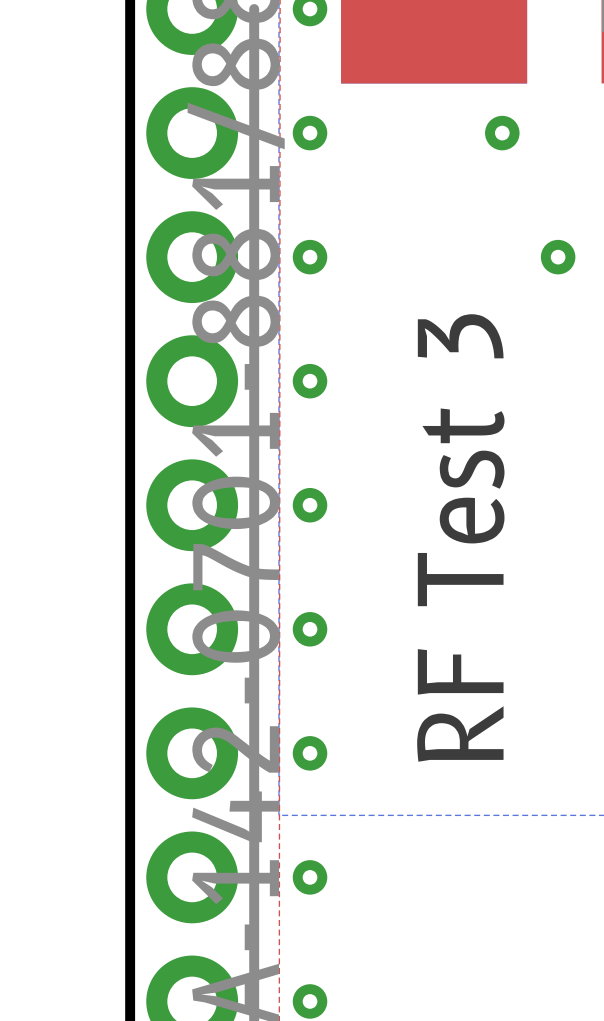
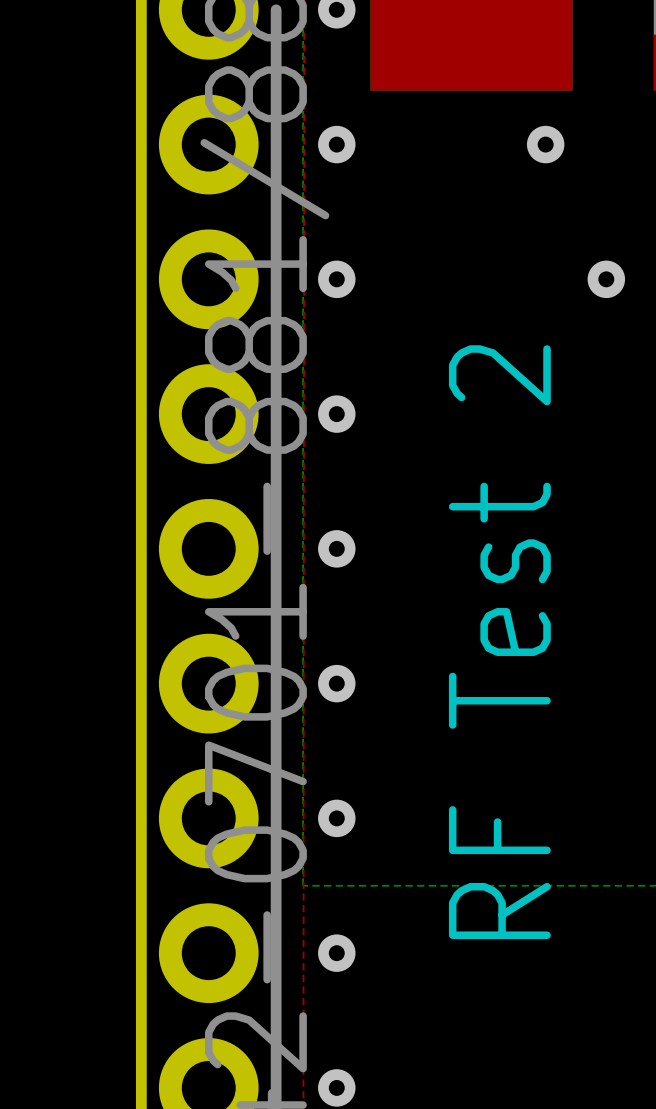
text: RF Test 3 (460, 537) -> RF Test 2 (499, 642)

